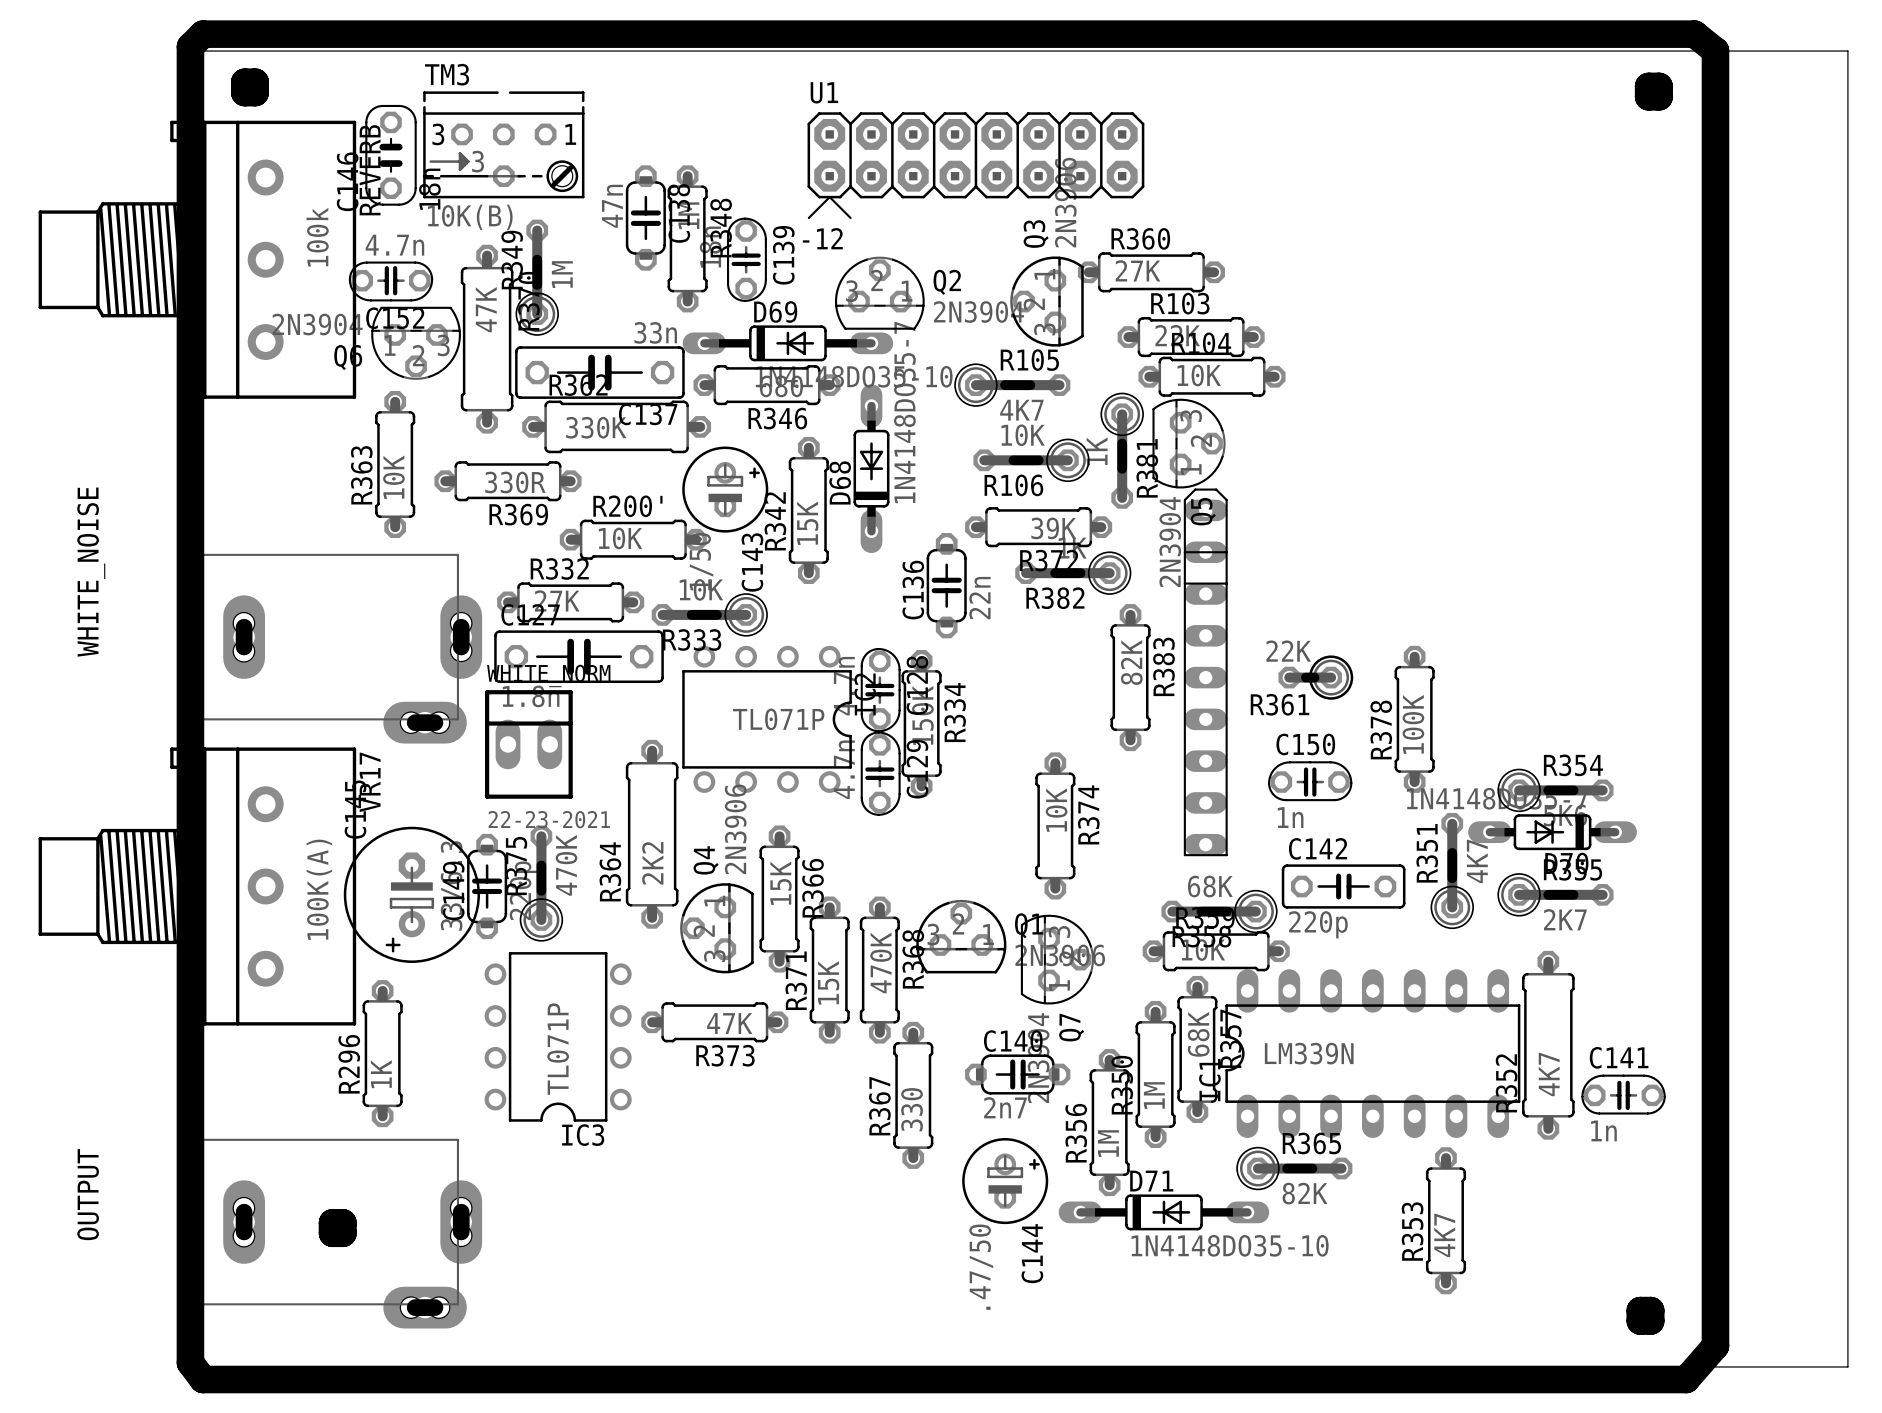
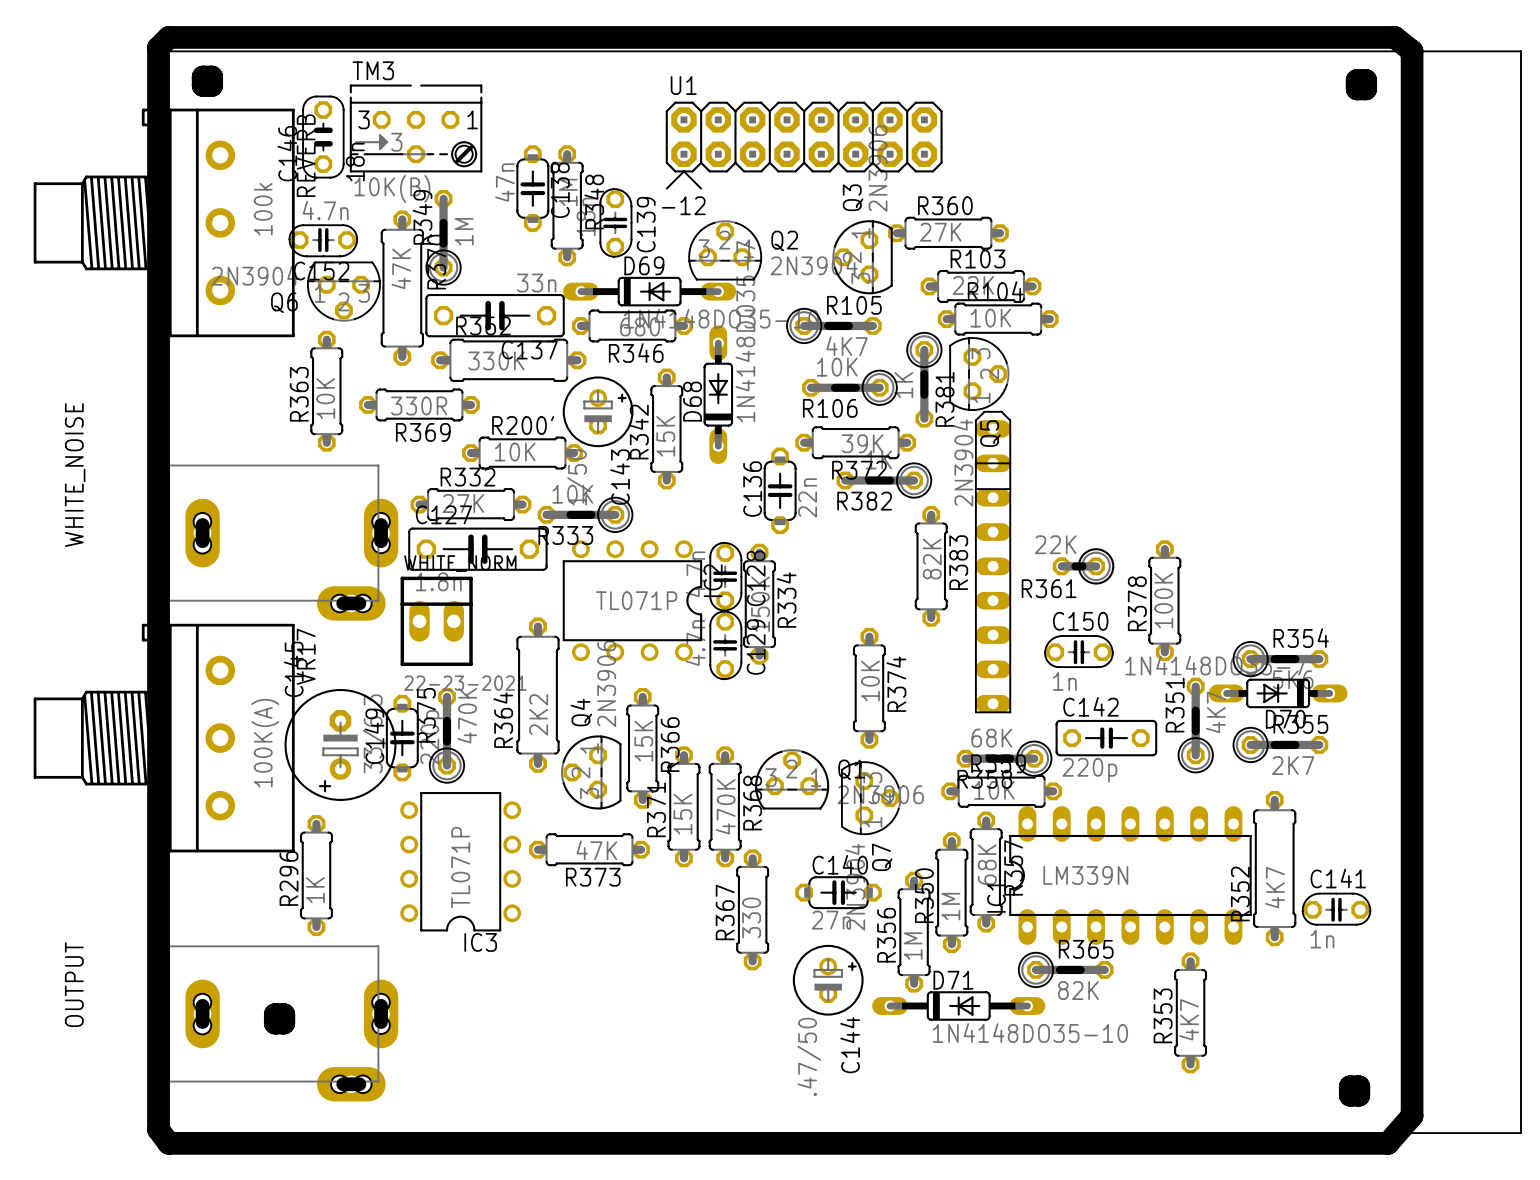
C140 value: 2n7 (1005, 1107) -> 27n (831, 920)

